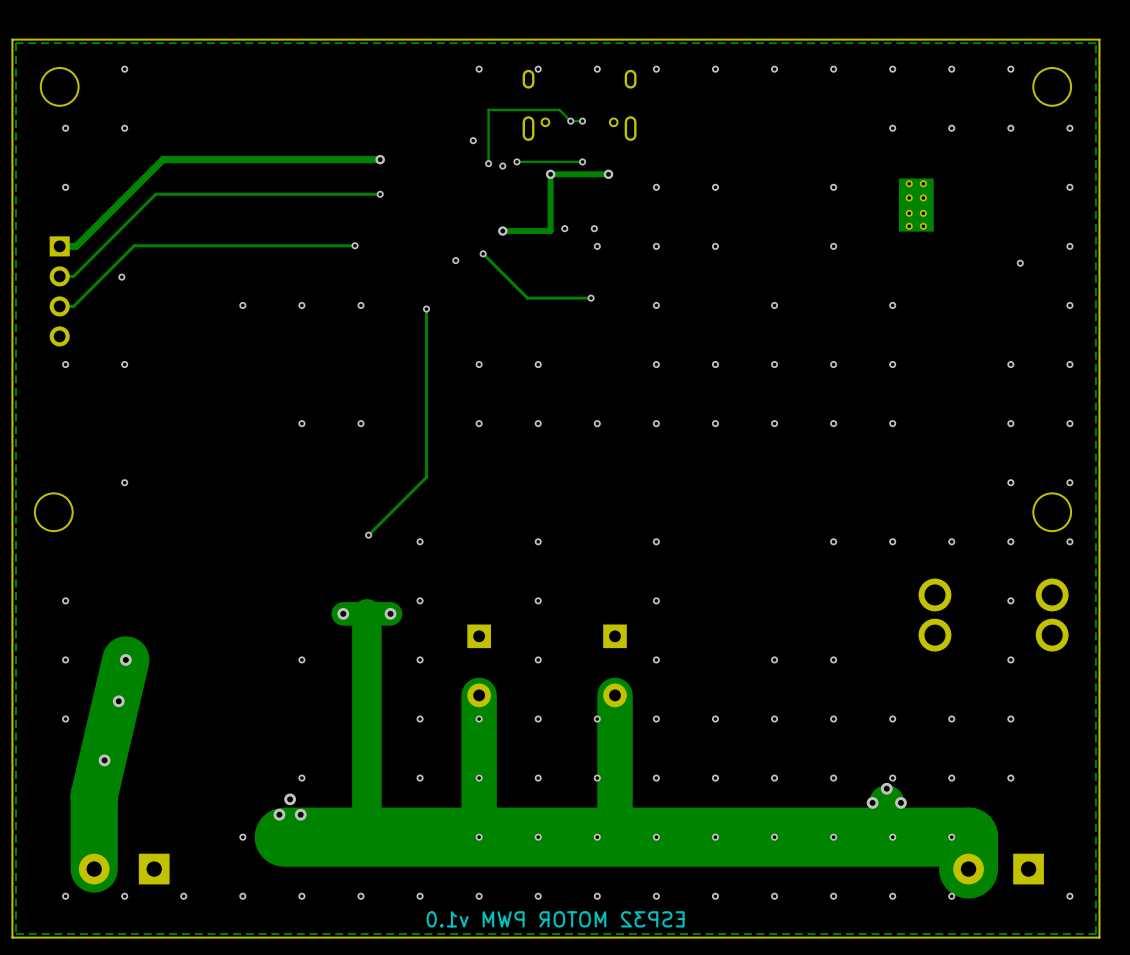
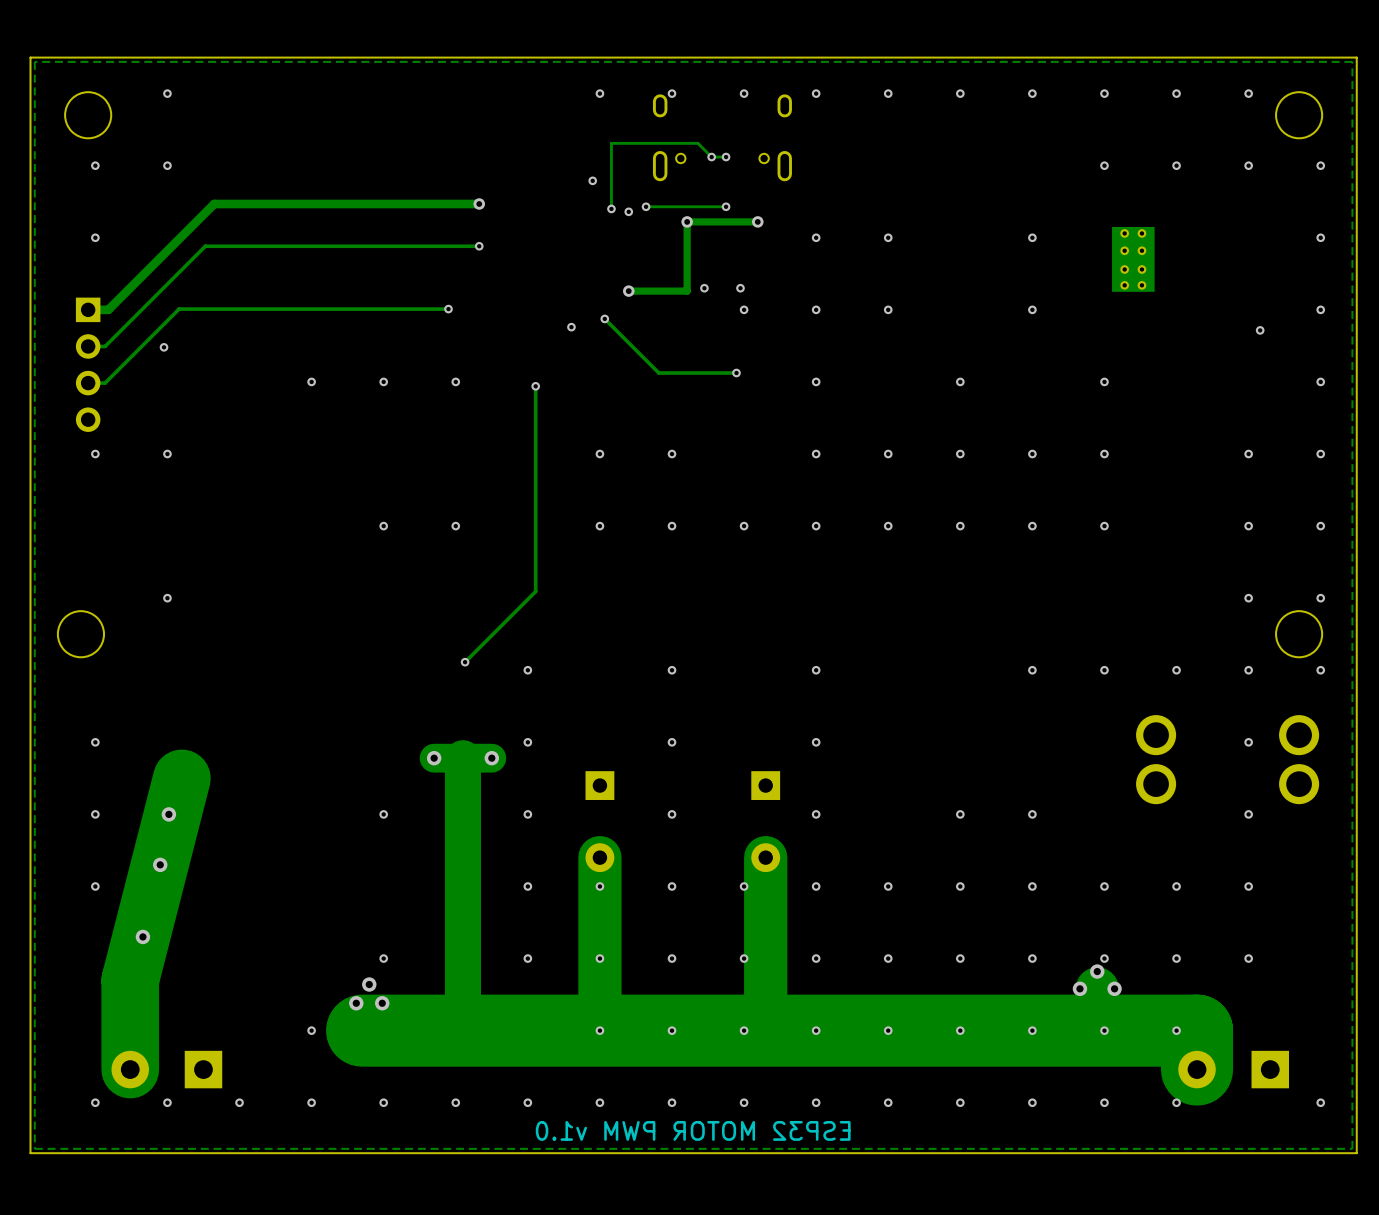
track: (125, 659) (94, 795) -> (181, 778) (130, 980)

